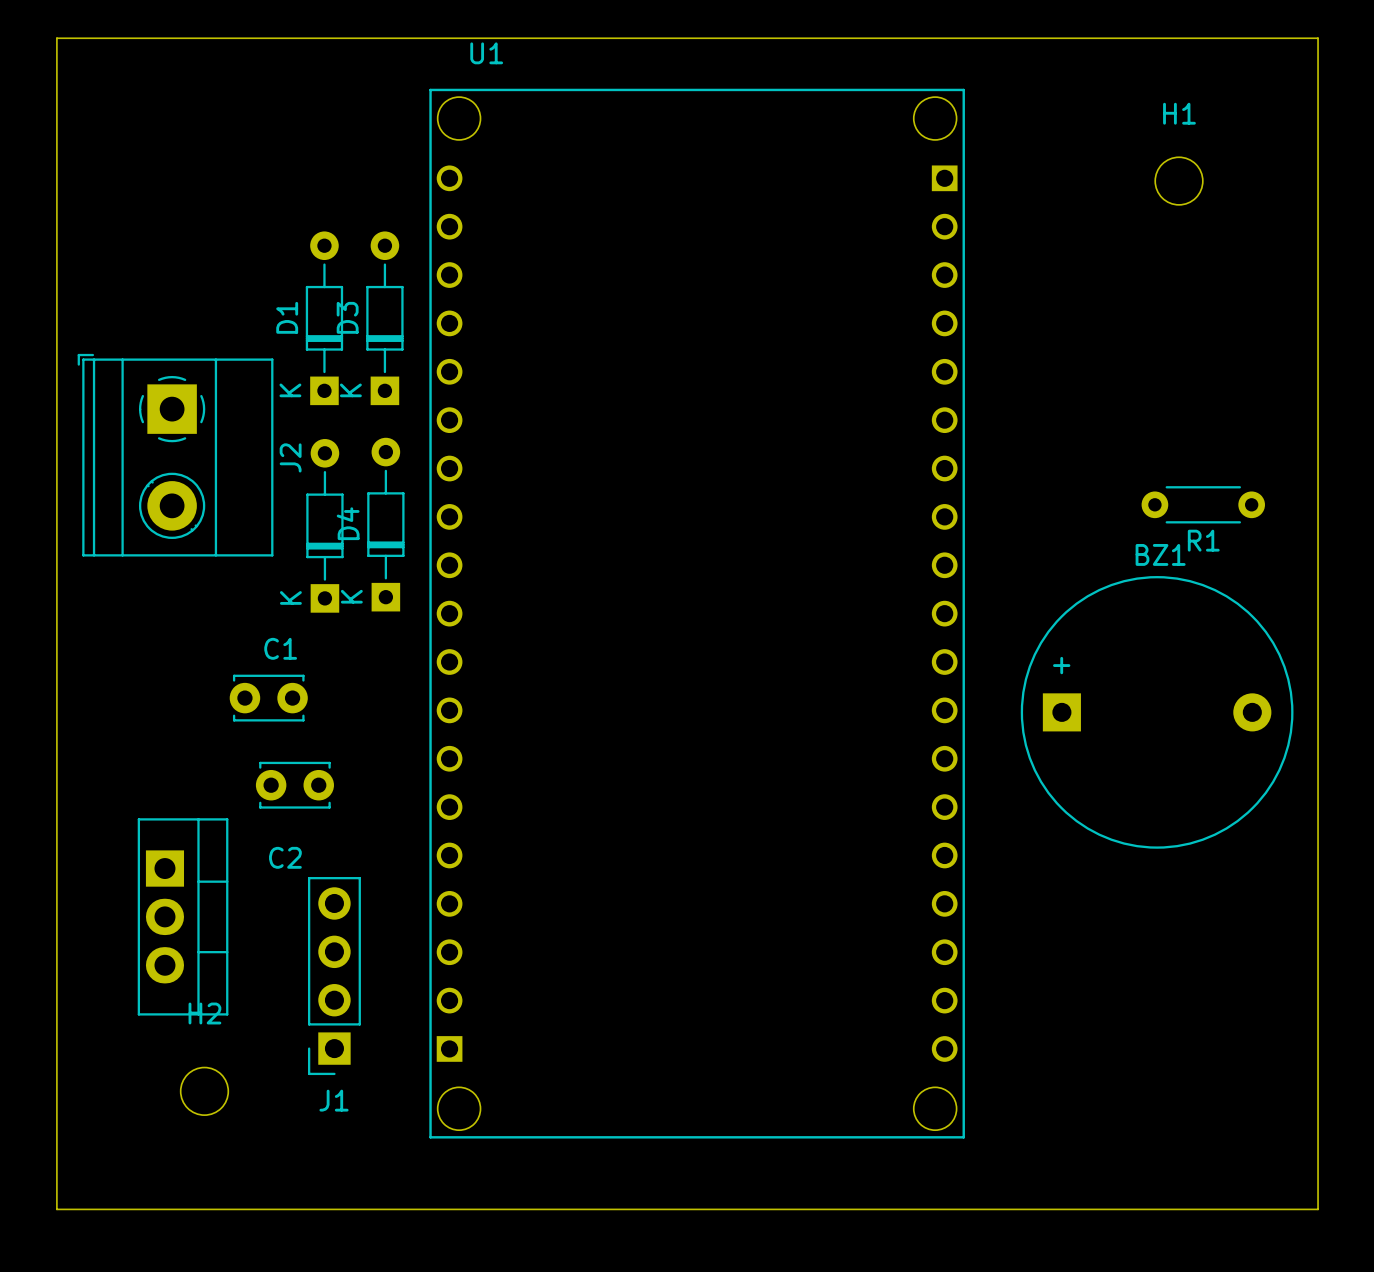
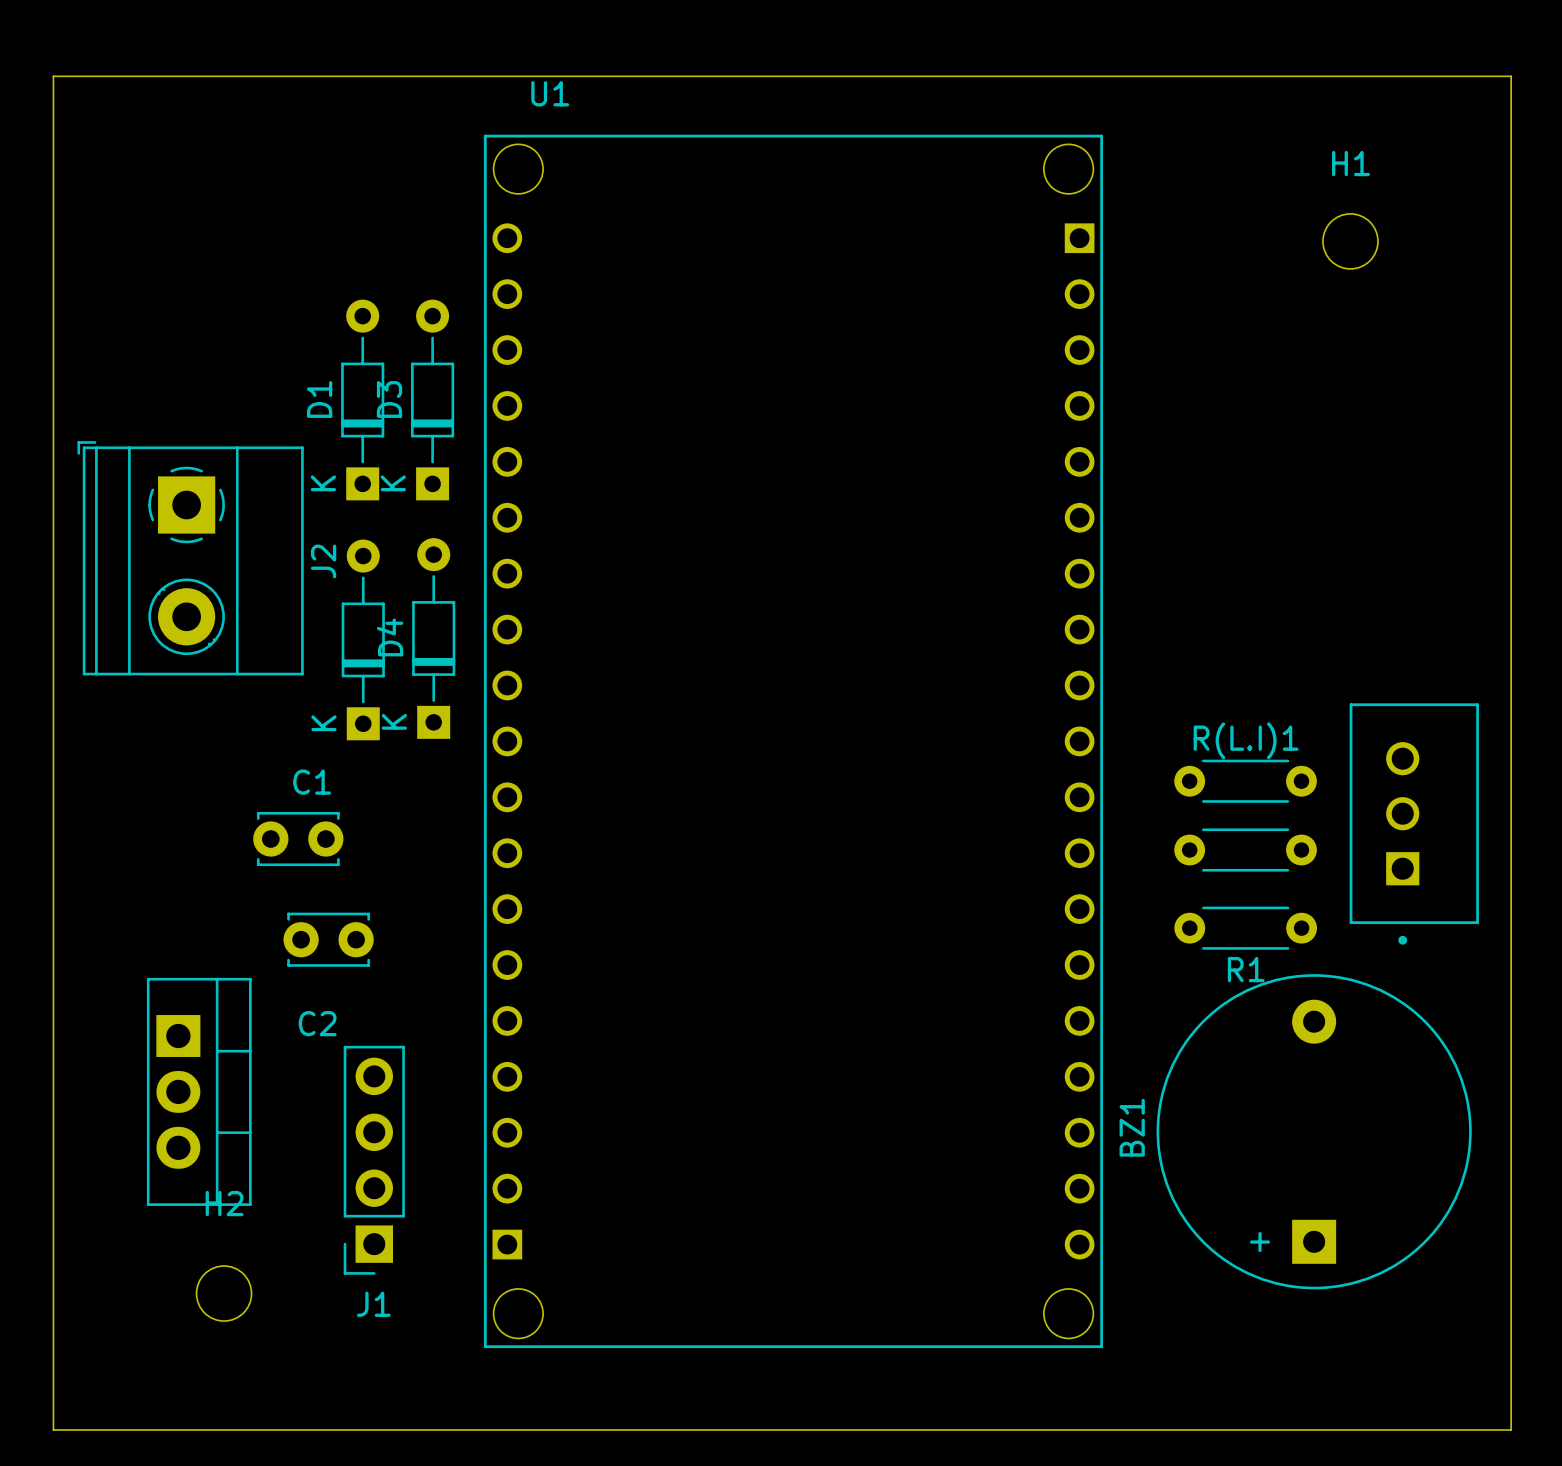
R1 position: (1203, 504) -> (1245, 928)
R(L.I)1: none -> (1245, 781)
part: none -> (1414, 824)
part: none -> (1245, 850)
BZ1 rotation: 0° (1157, 712) -> 90° counterclockwise (1314, 1131)
BZ1 position: (1157, 712) -> (1314, 1131)

